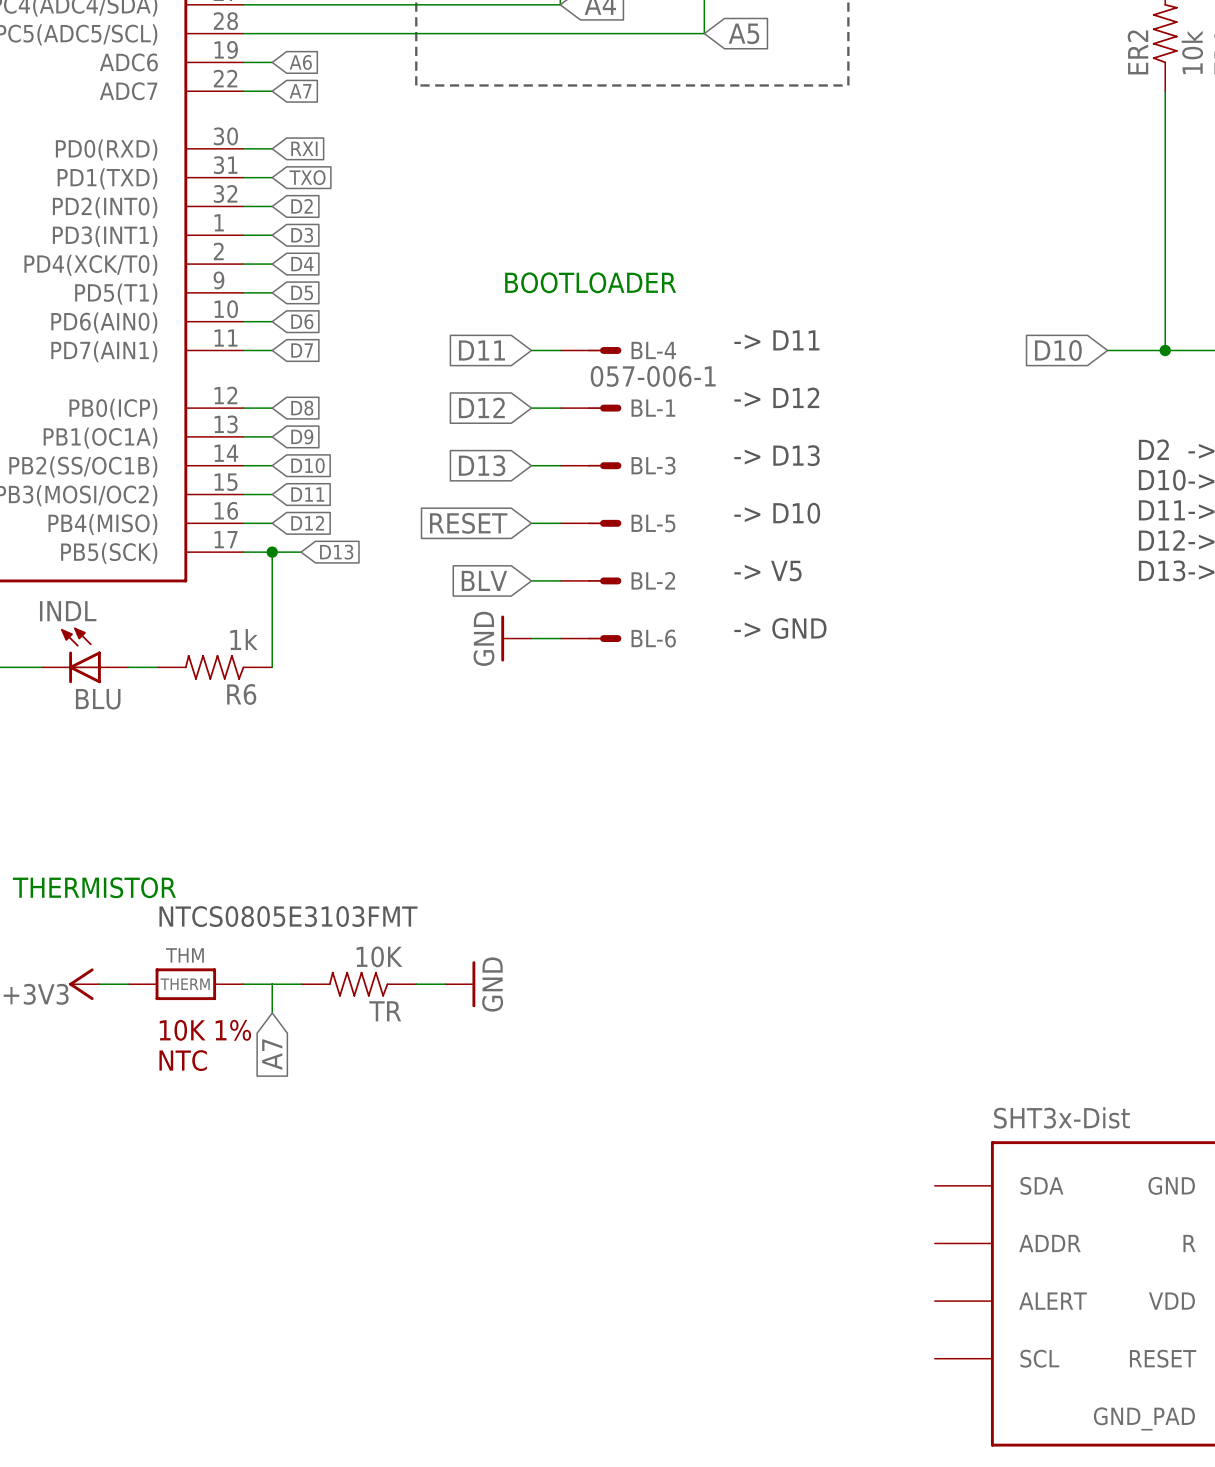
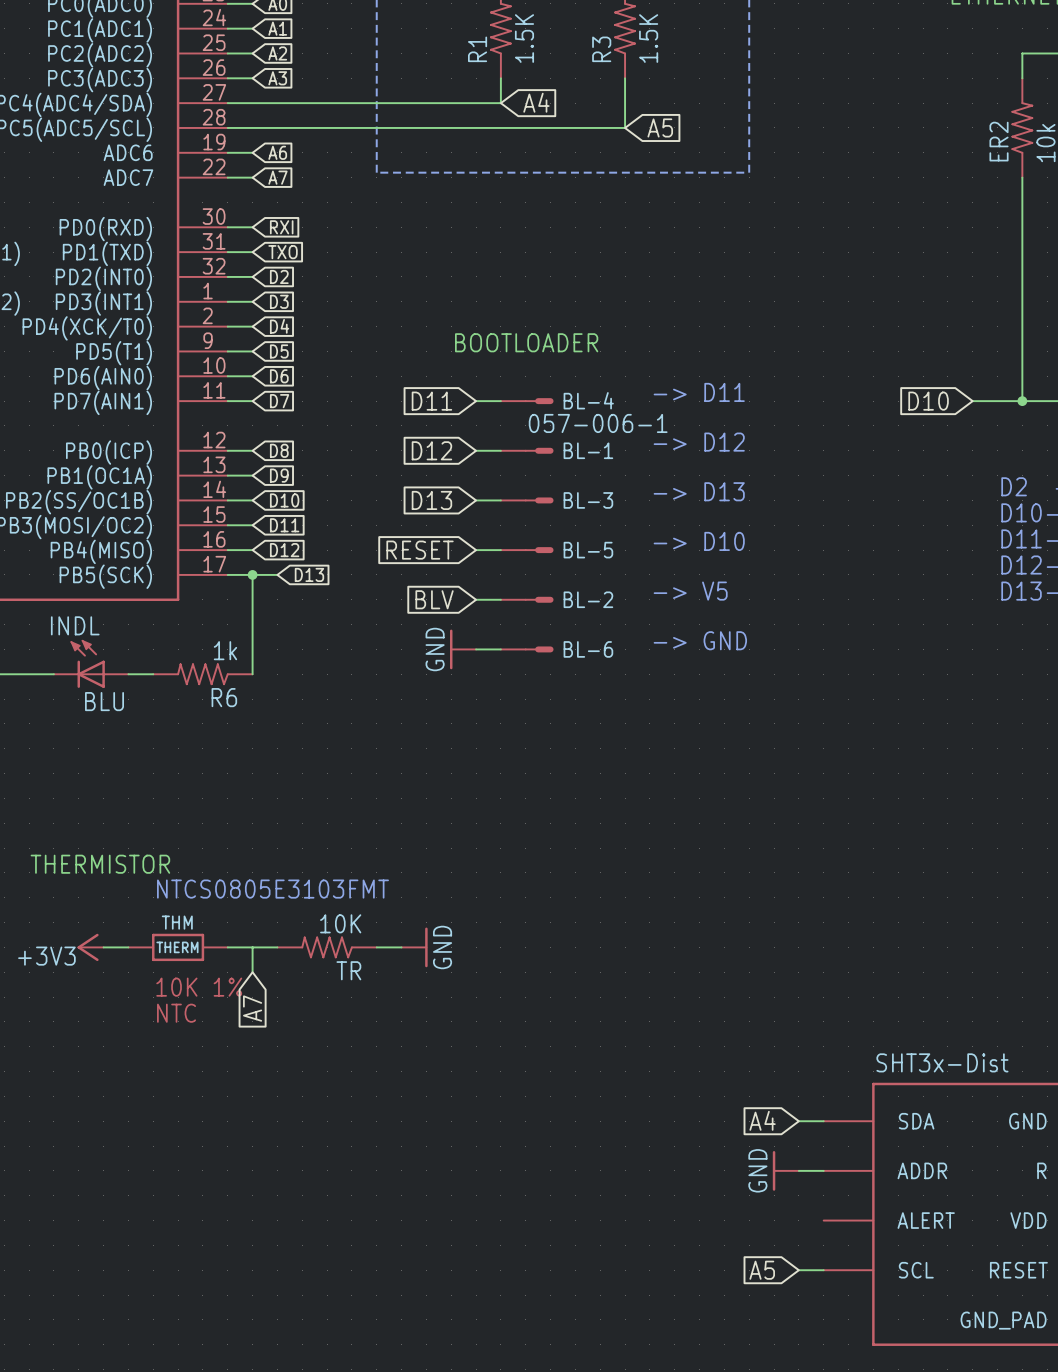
global label: none -> A4 (762, 1120)
wire: none -> (798, 1121) (823, 1121)
power symbol: none -> GND (785, 1170)
wire: none -> (798, 1170) (823, 1170)
global label: none -> A5 (762, 1270)
wire: none -> (798, 1270) (823, 1270)

